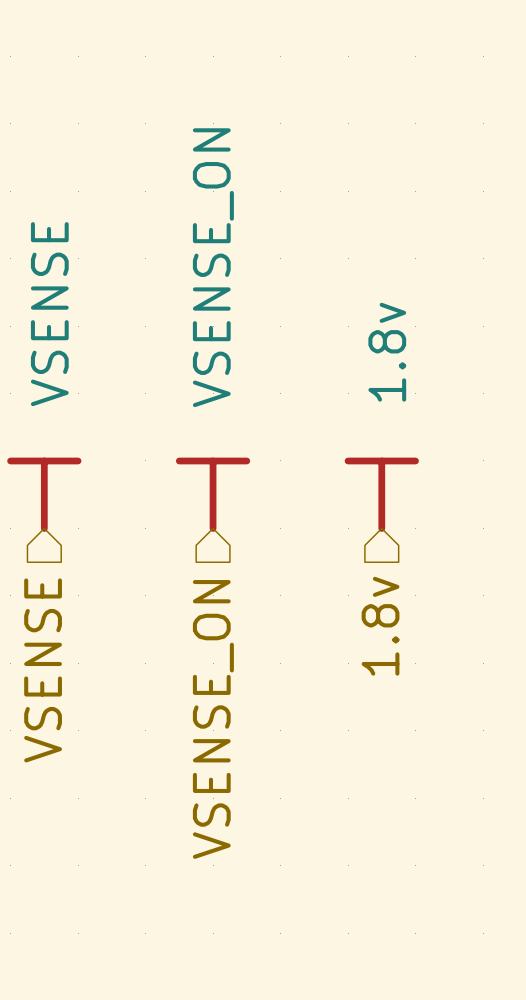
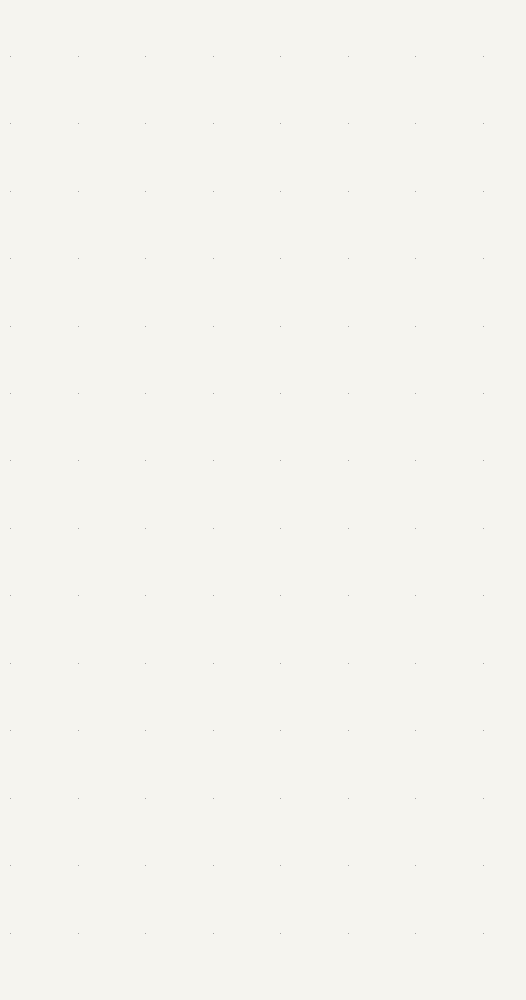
power symbol: VSENSE (44, 494) -> none
power symbol: VSENSE_ON (213, 494) -> none
power symbol: 1.8v (381, 494) -> none
hierarchical label: 1.8v (380, 626) -> none
hierarchical label: VSENSE (43, 670) -> none
hierarchical label: VSENSE_ON (213, 719) -> none

